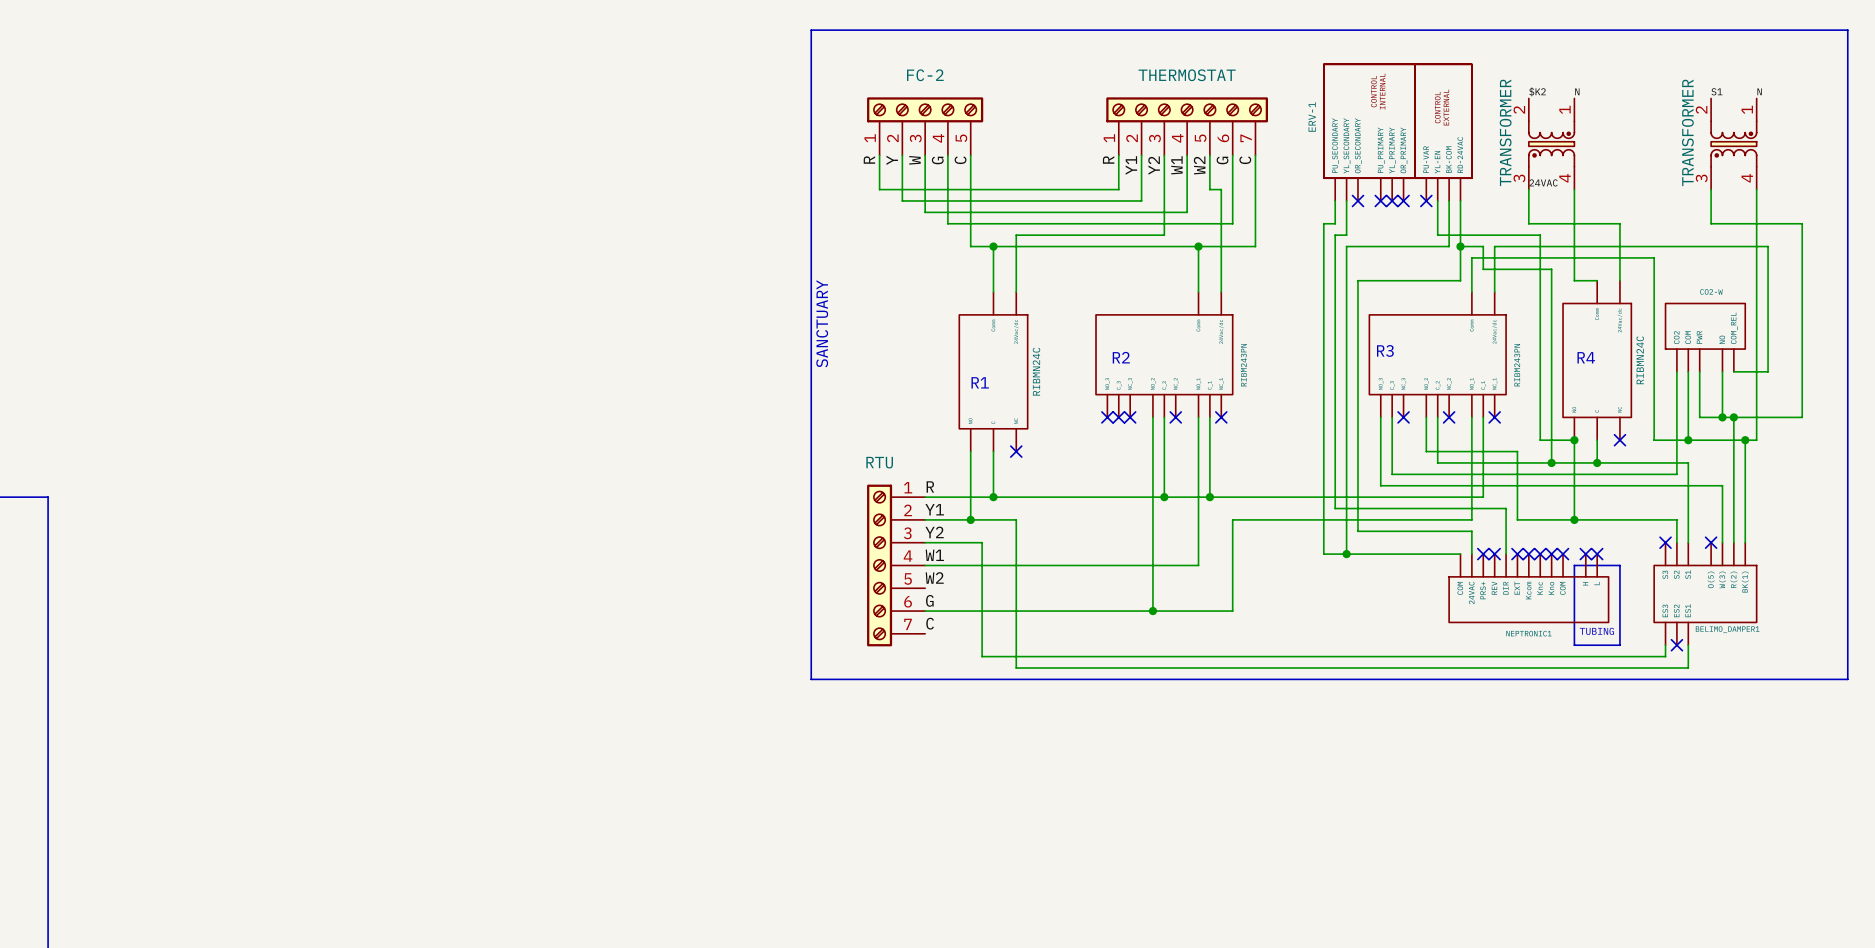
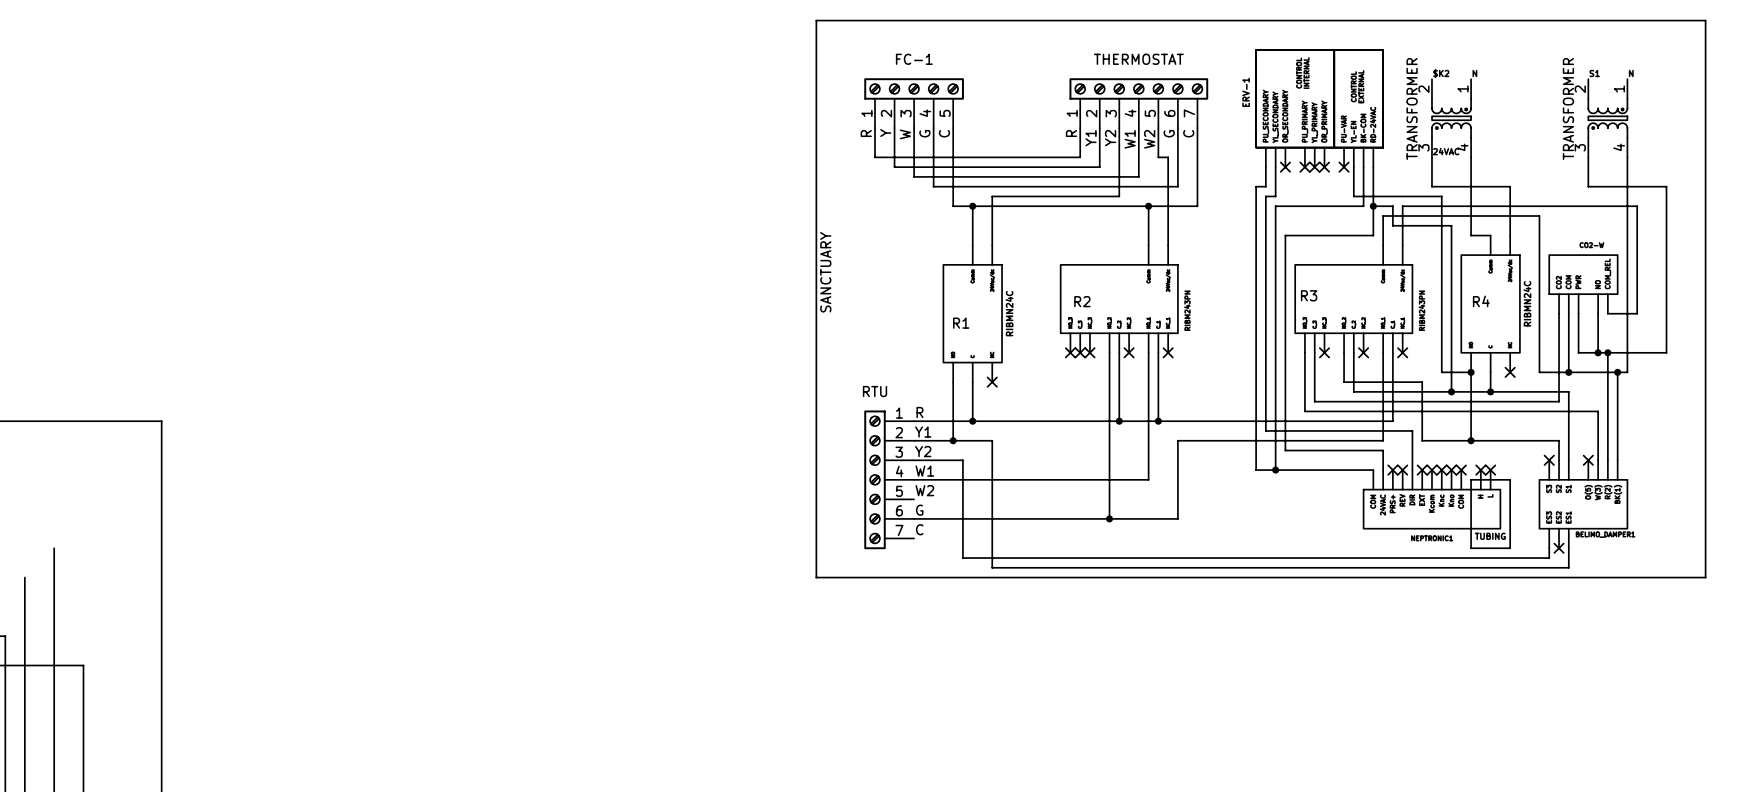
part value: FC-2 (925, 75) -> FC-1 (914, 59)

